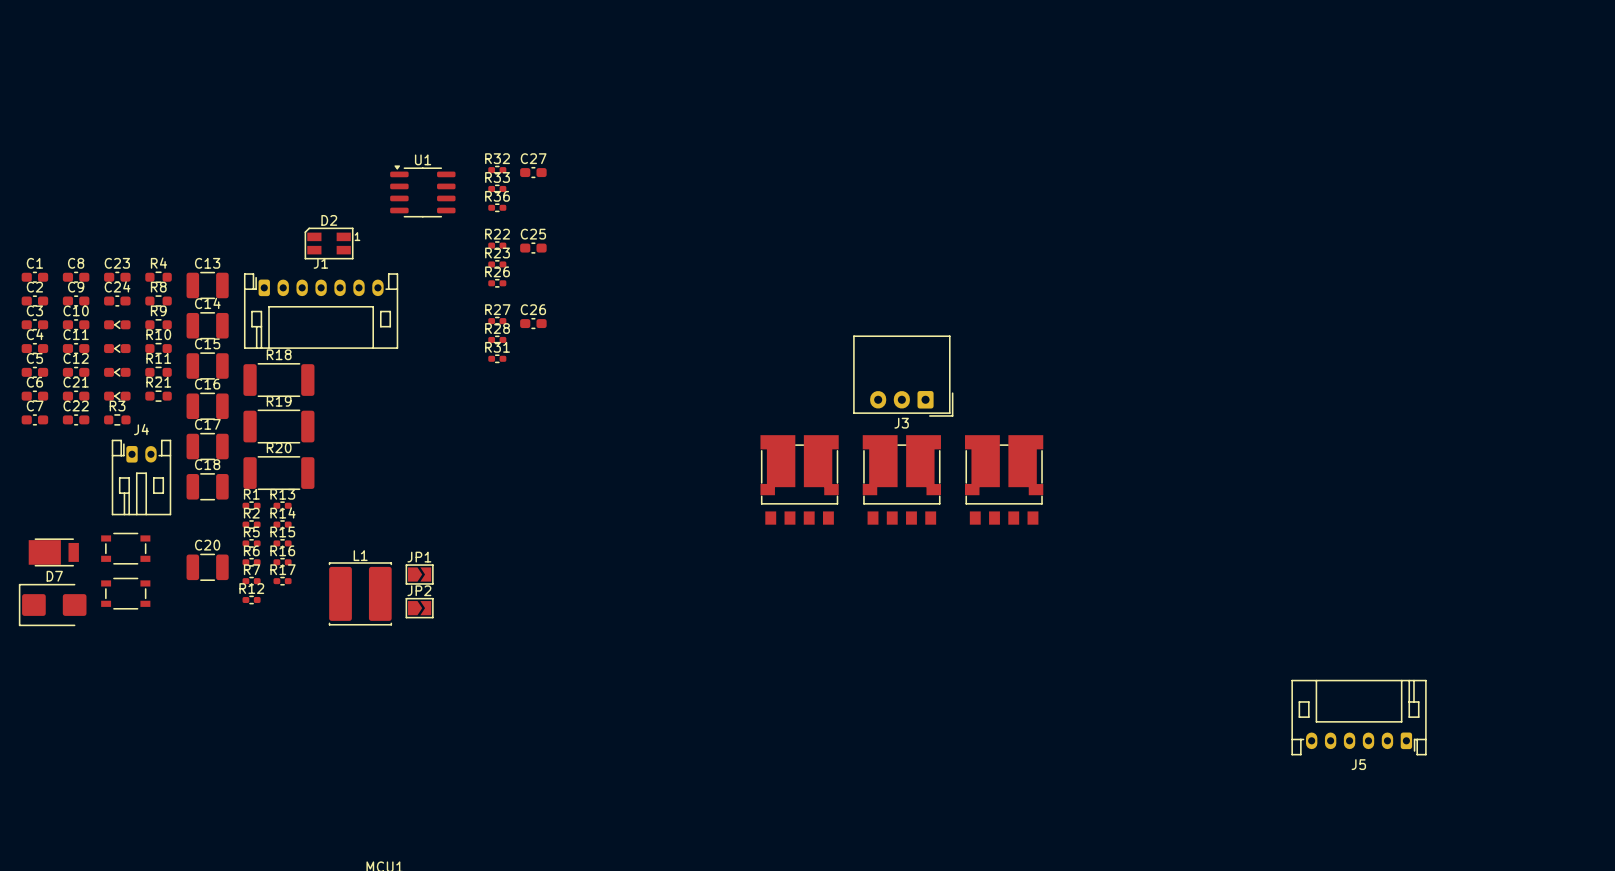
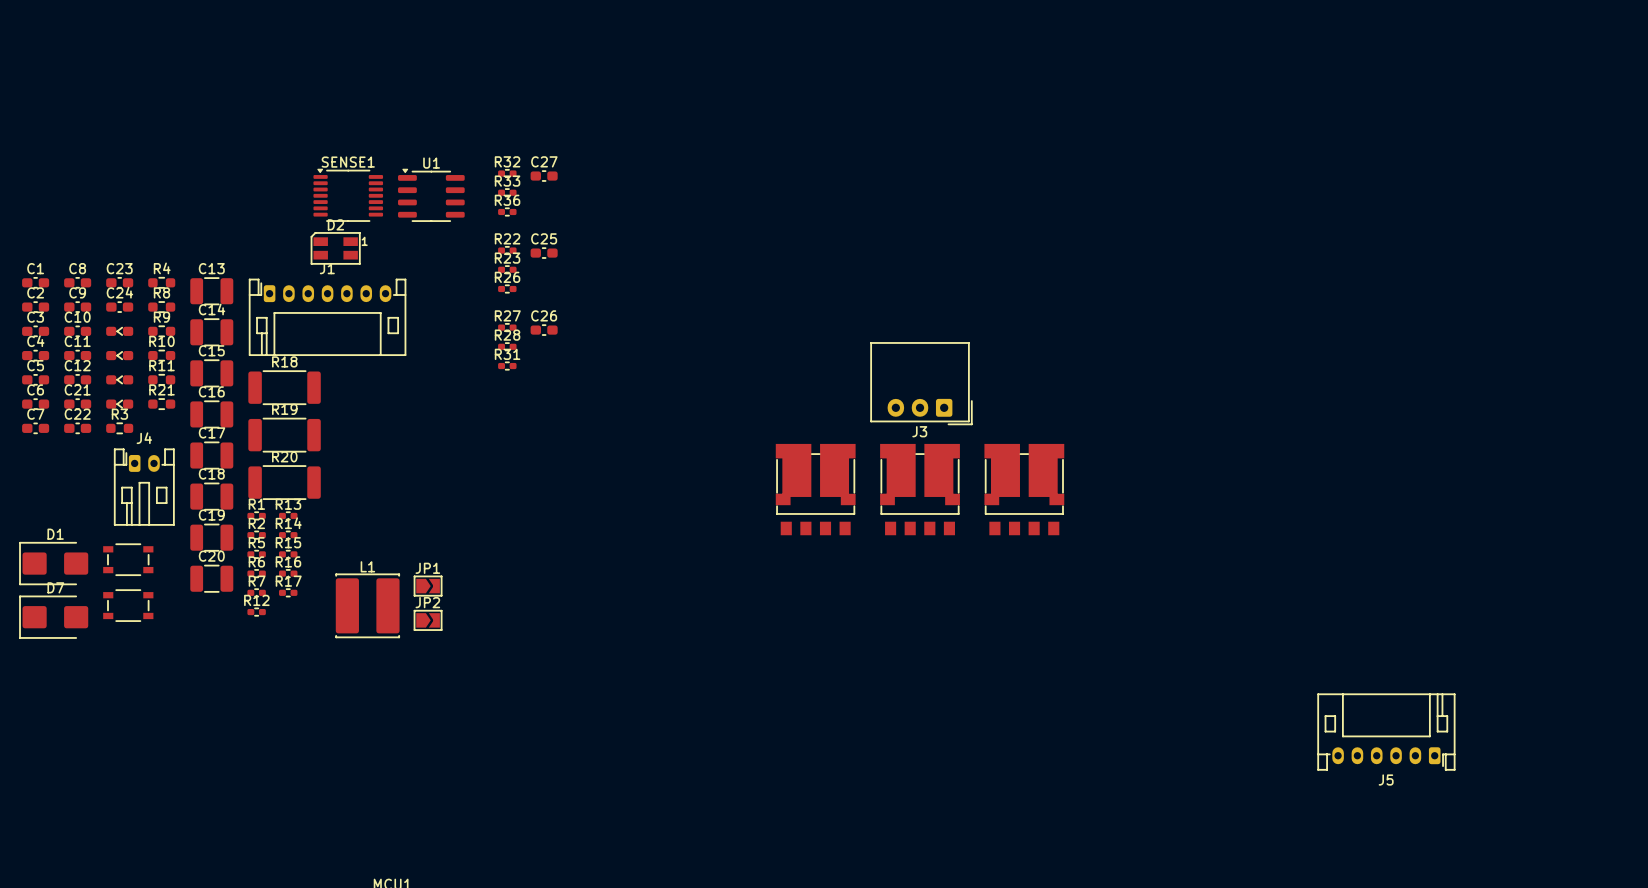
SENSE1: none -> (348, 195)
C19: none -> (211, 537)
D1: none -> (53, 563)
part: (53, 552) -> none

